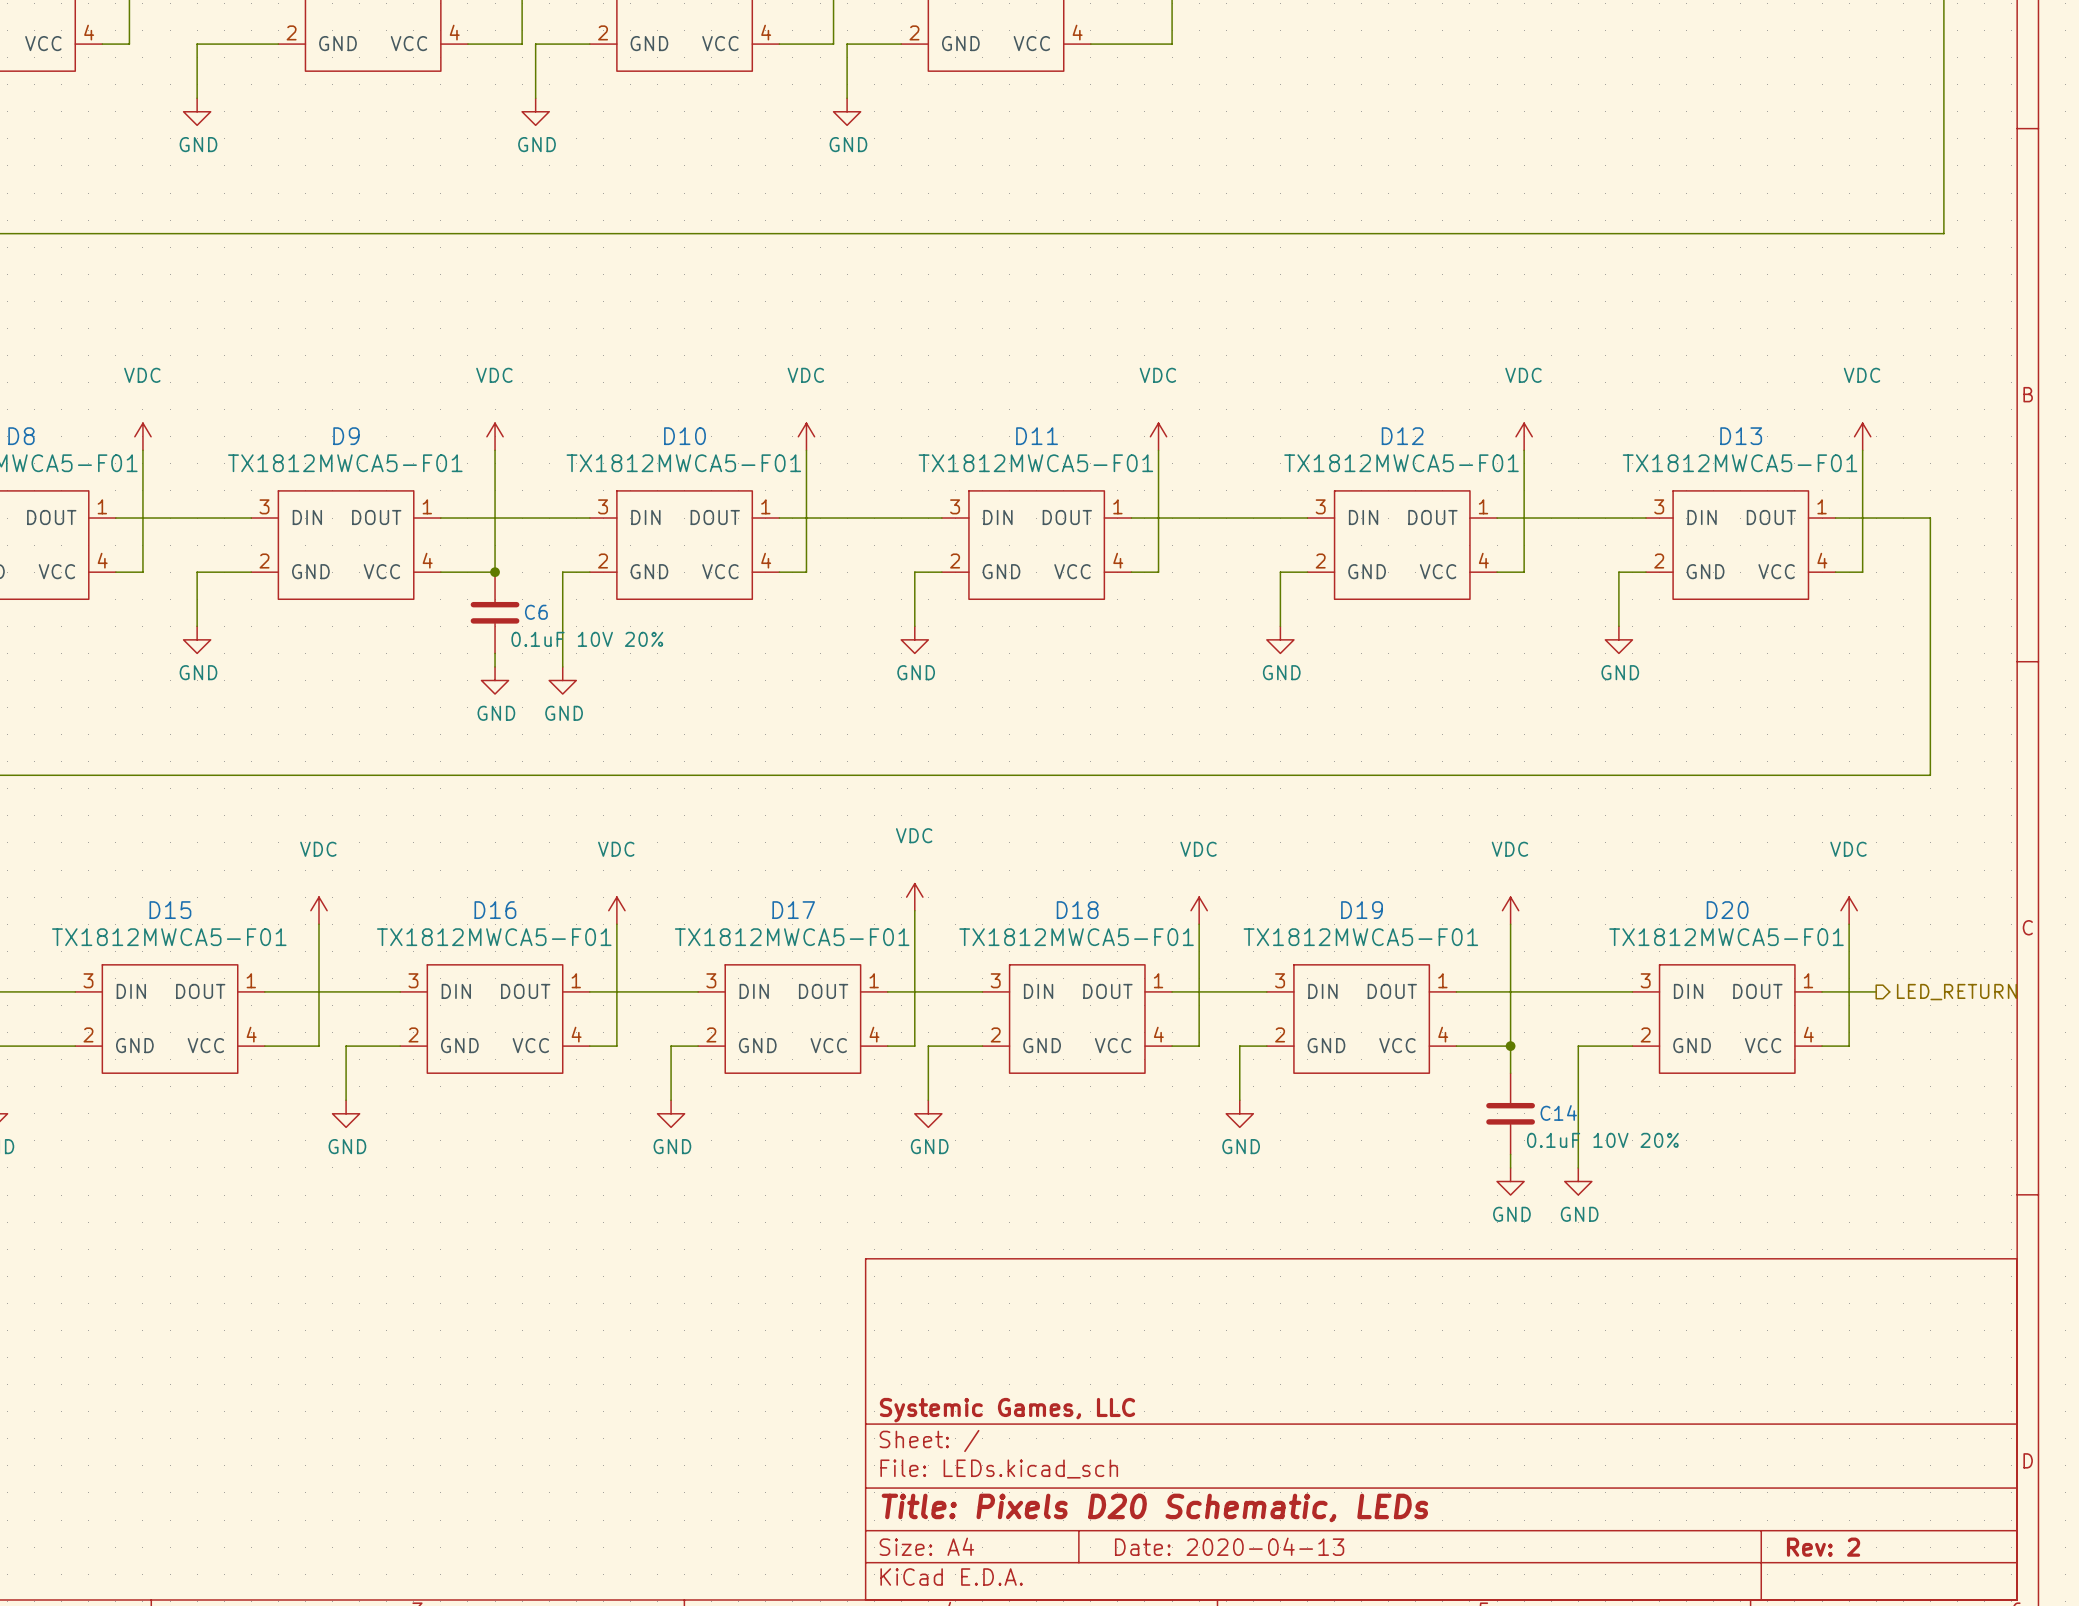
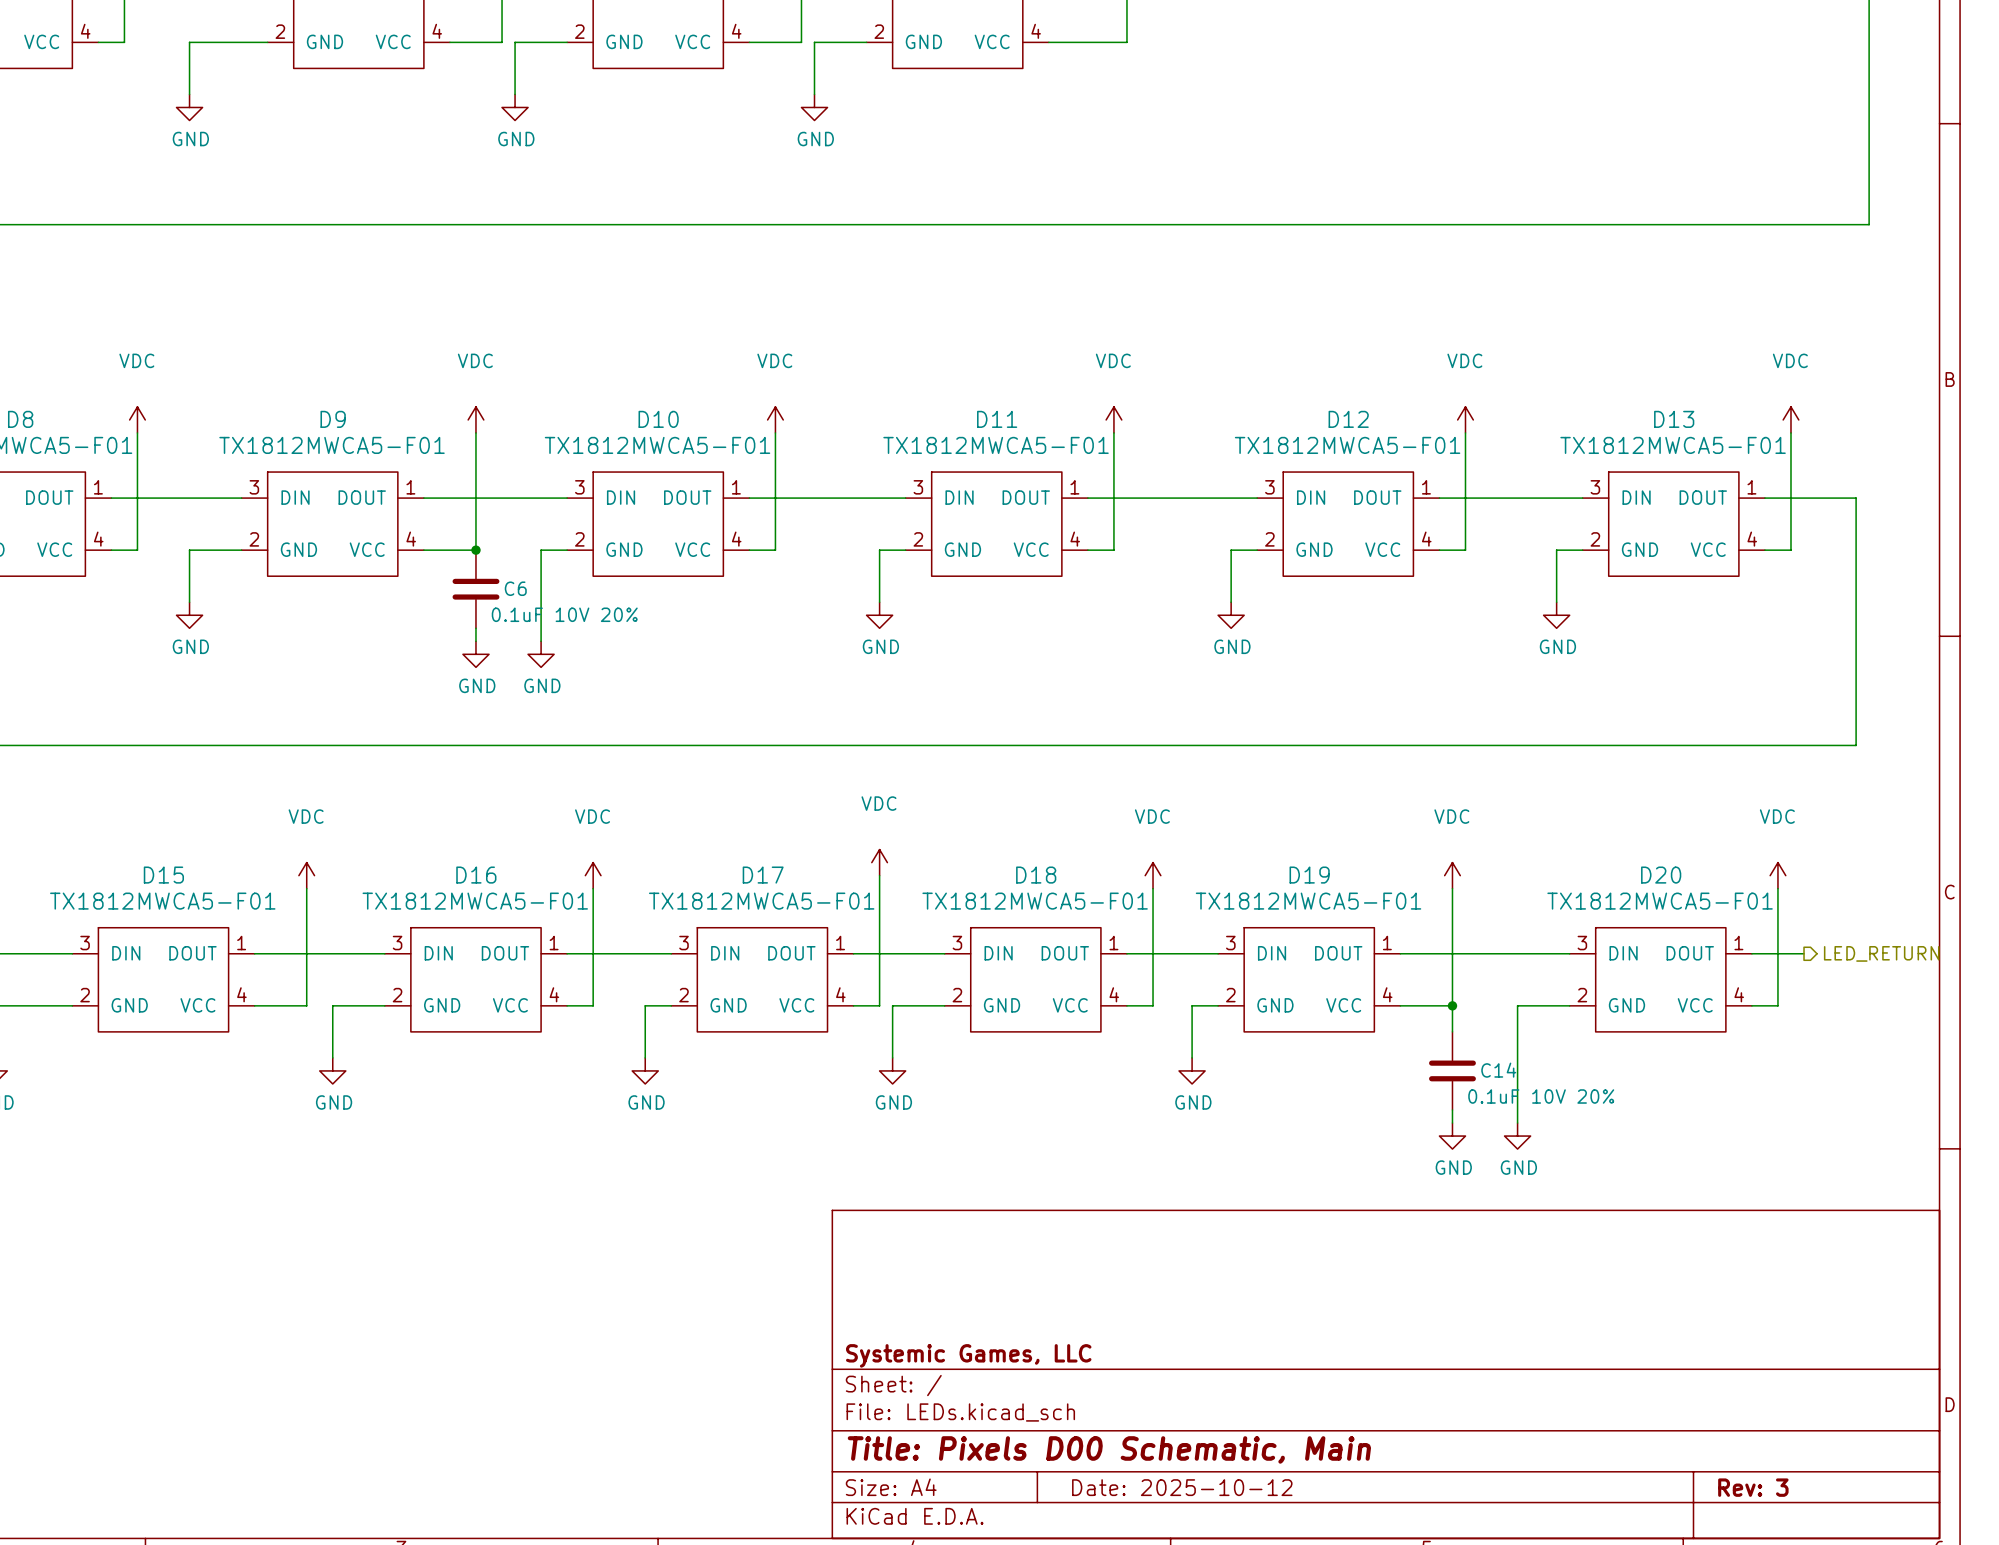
title block: Title: Pixels D20 Schematic, LEDs (1154, 1507) -> Title: Pixels D00 Schematic, Main (1109, 1449)
title block: Date: 2020-04-13 (1229, 1546) -> Date: 2025-10-12 (1182, 1487)
title block: Rev: 2 (1823, 1547) -> Rev: 3 (1753, 1487)

